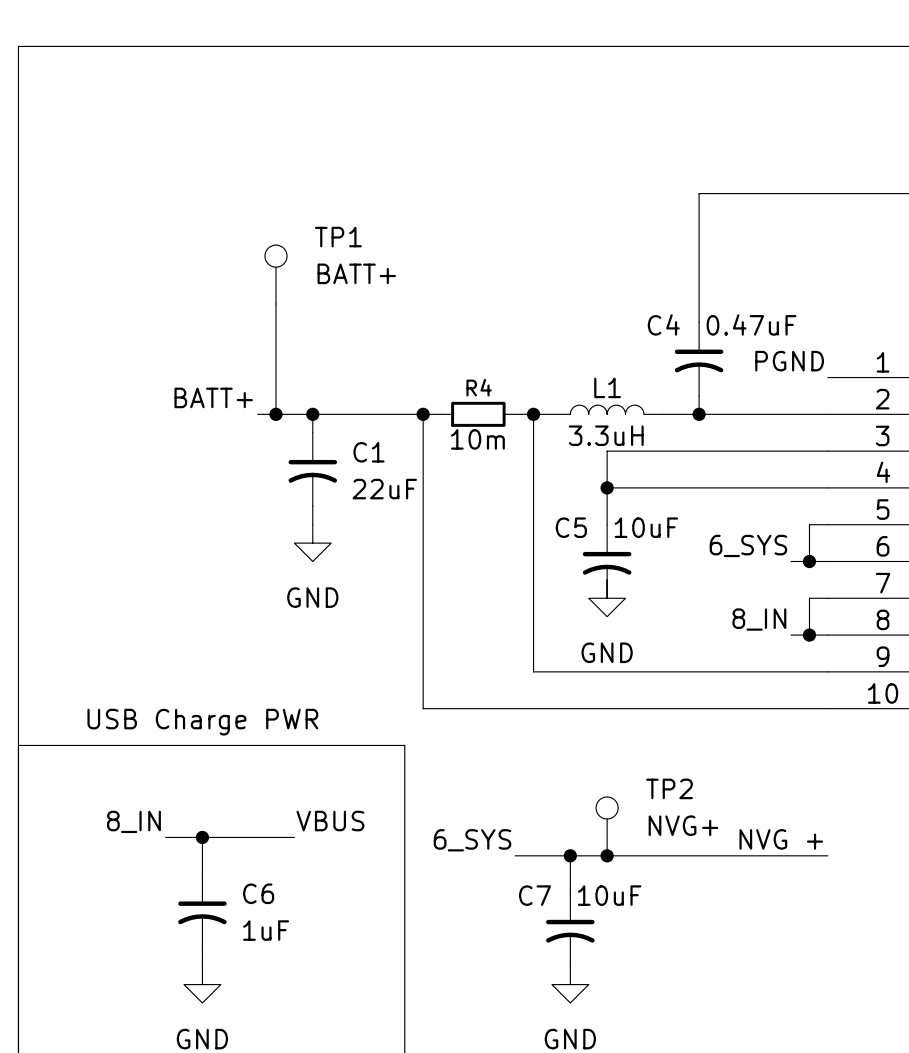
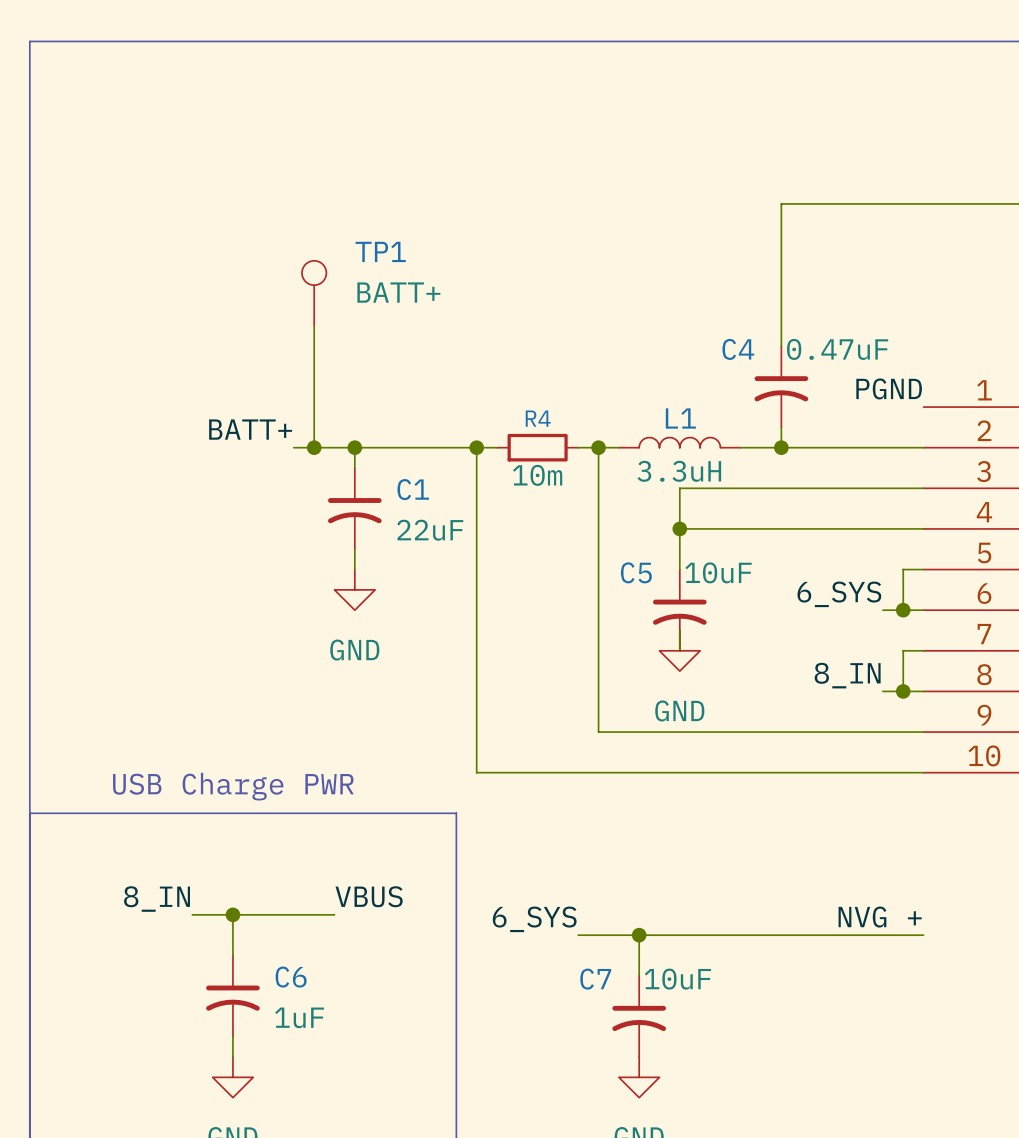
TP2: NVG+ (607, 826) -> none
junction: (607, 855) -> none

